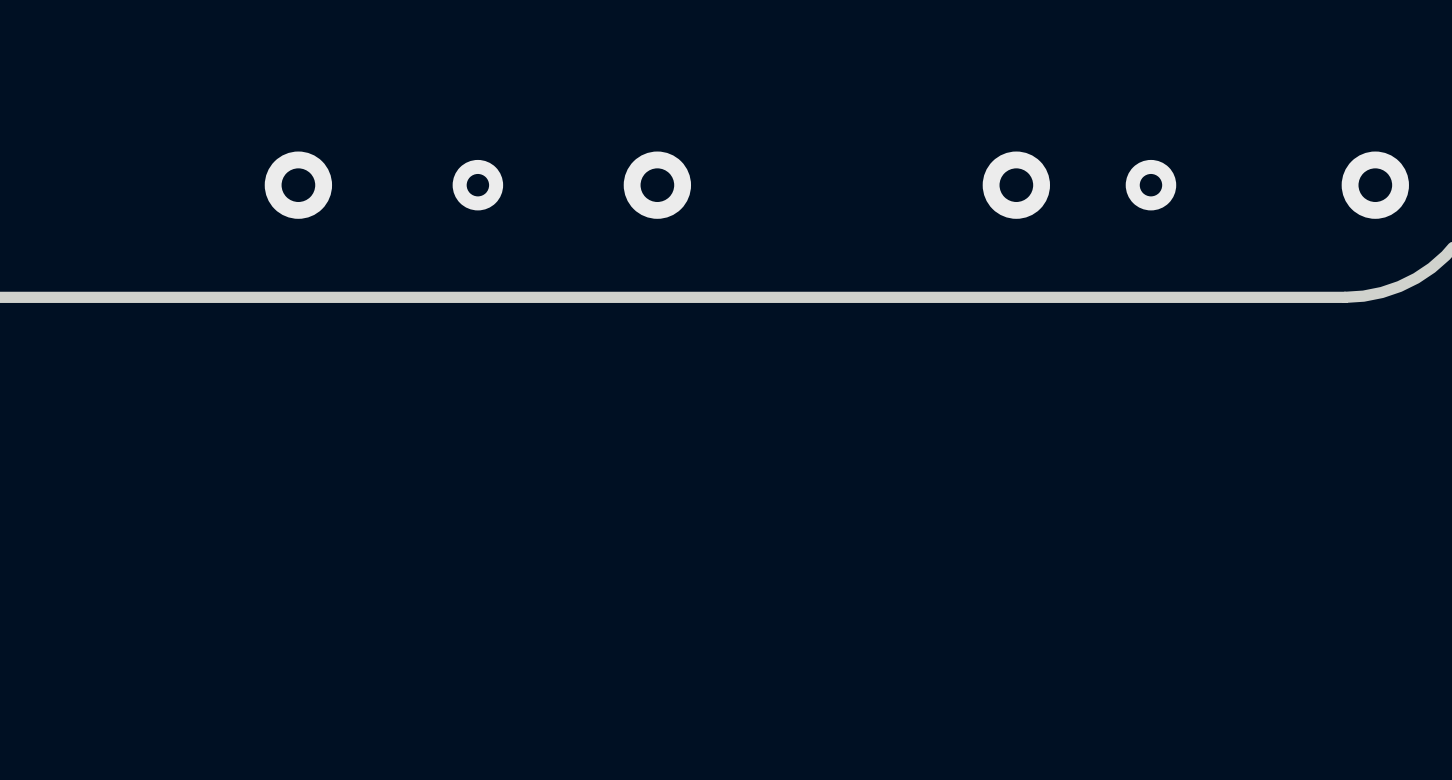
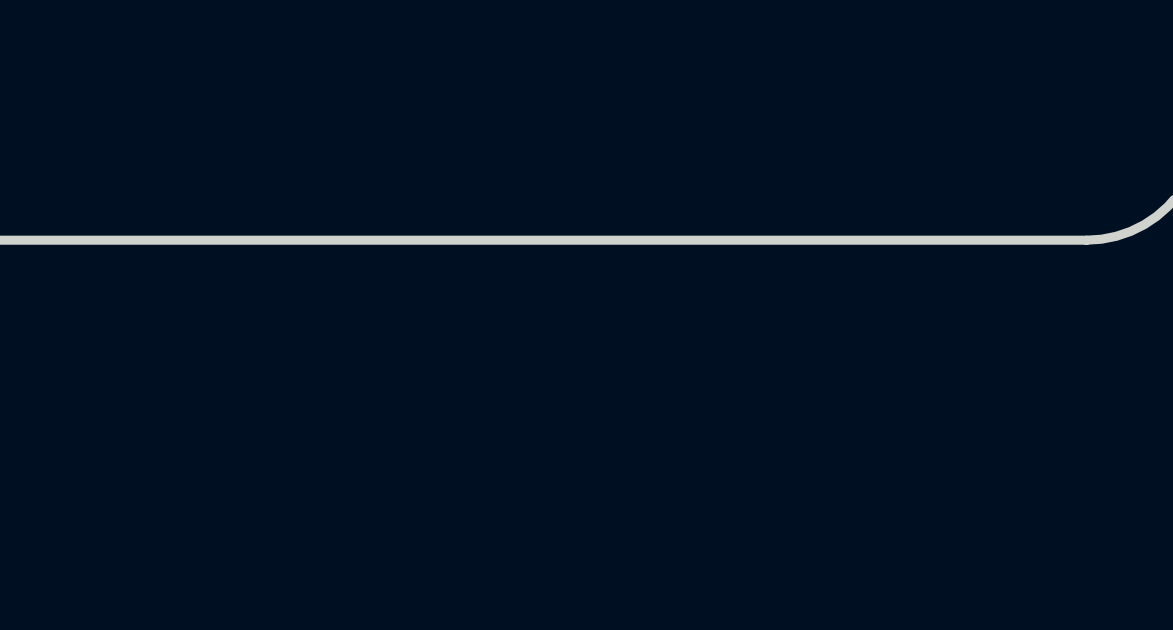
via: (298, 185) -> none
via: (477, 185) -> none
via: (657, 185) -> none
via: (1016, 185) -> none
via: (1150, 185) -> none
via: (1375, 185) -> none

